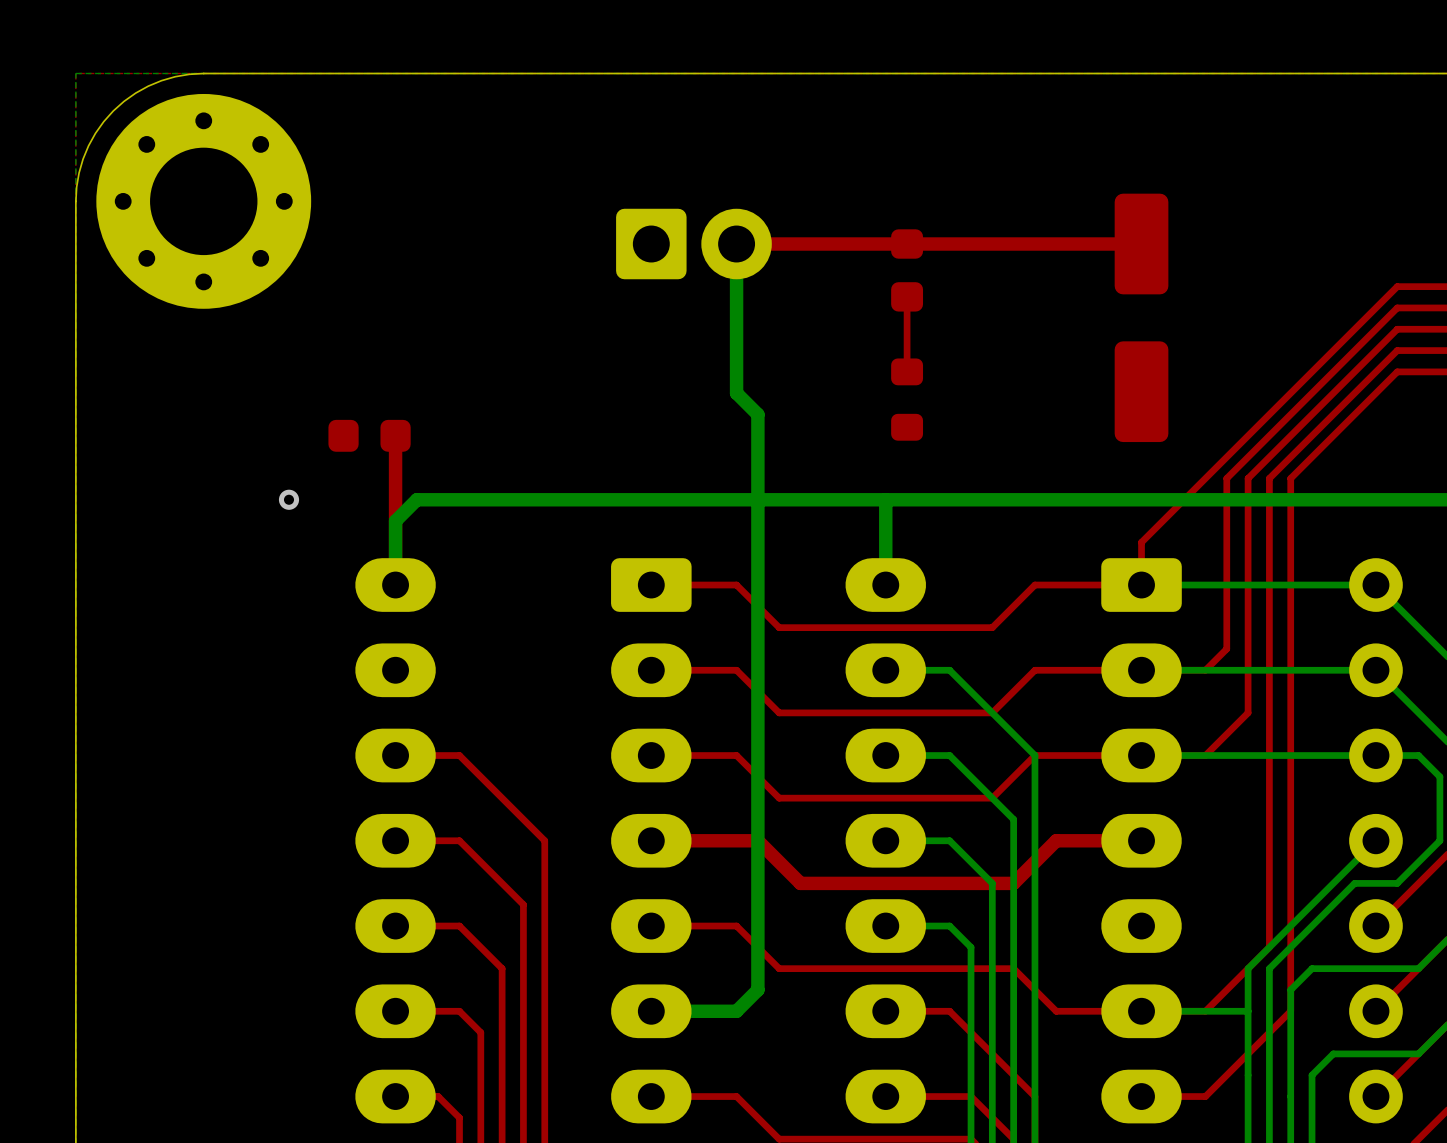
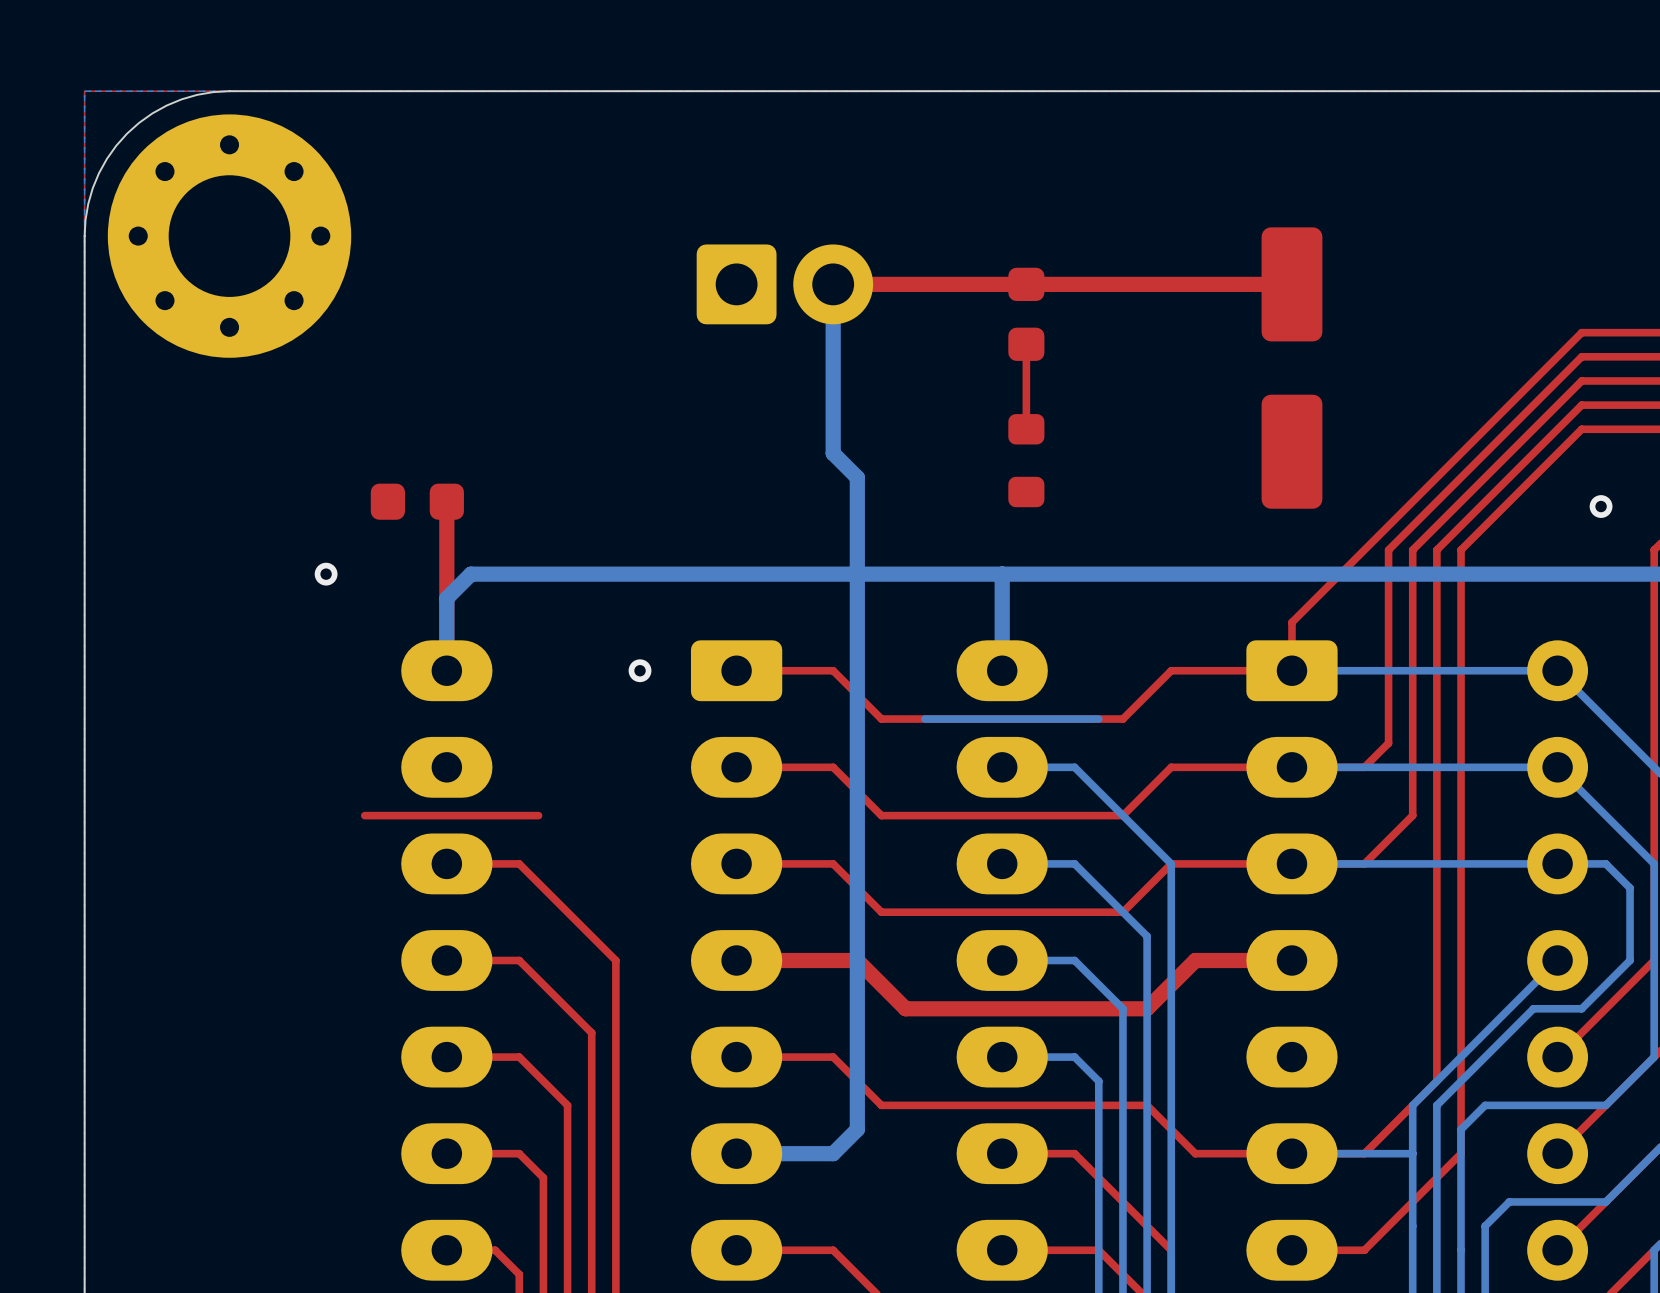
via: none -> (1601, 506)
via: none -> (640, 670)
bottom track: none -> (1098, 719) (924, 719)
top track: none -> (538, 815) (364, 815)

